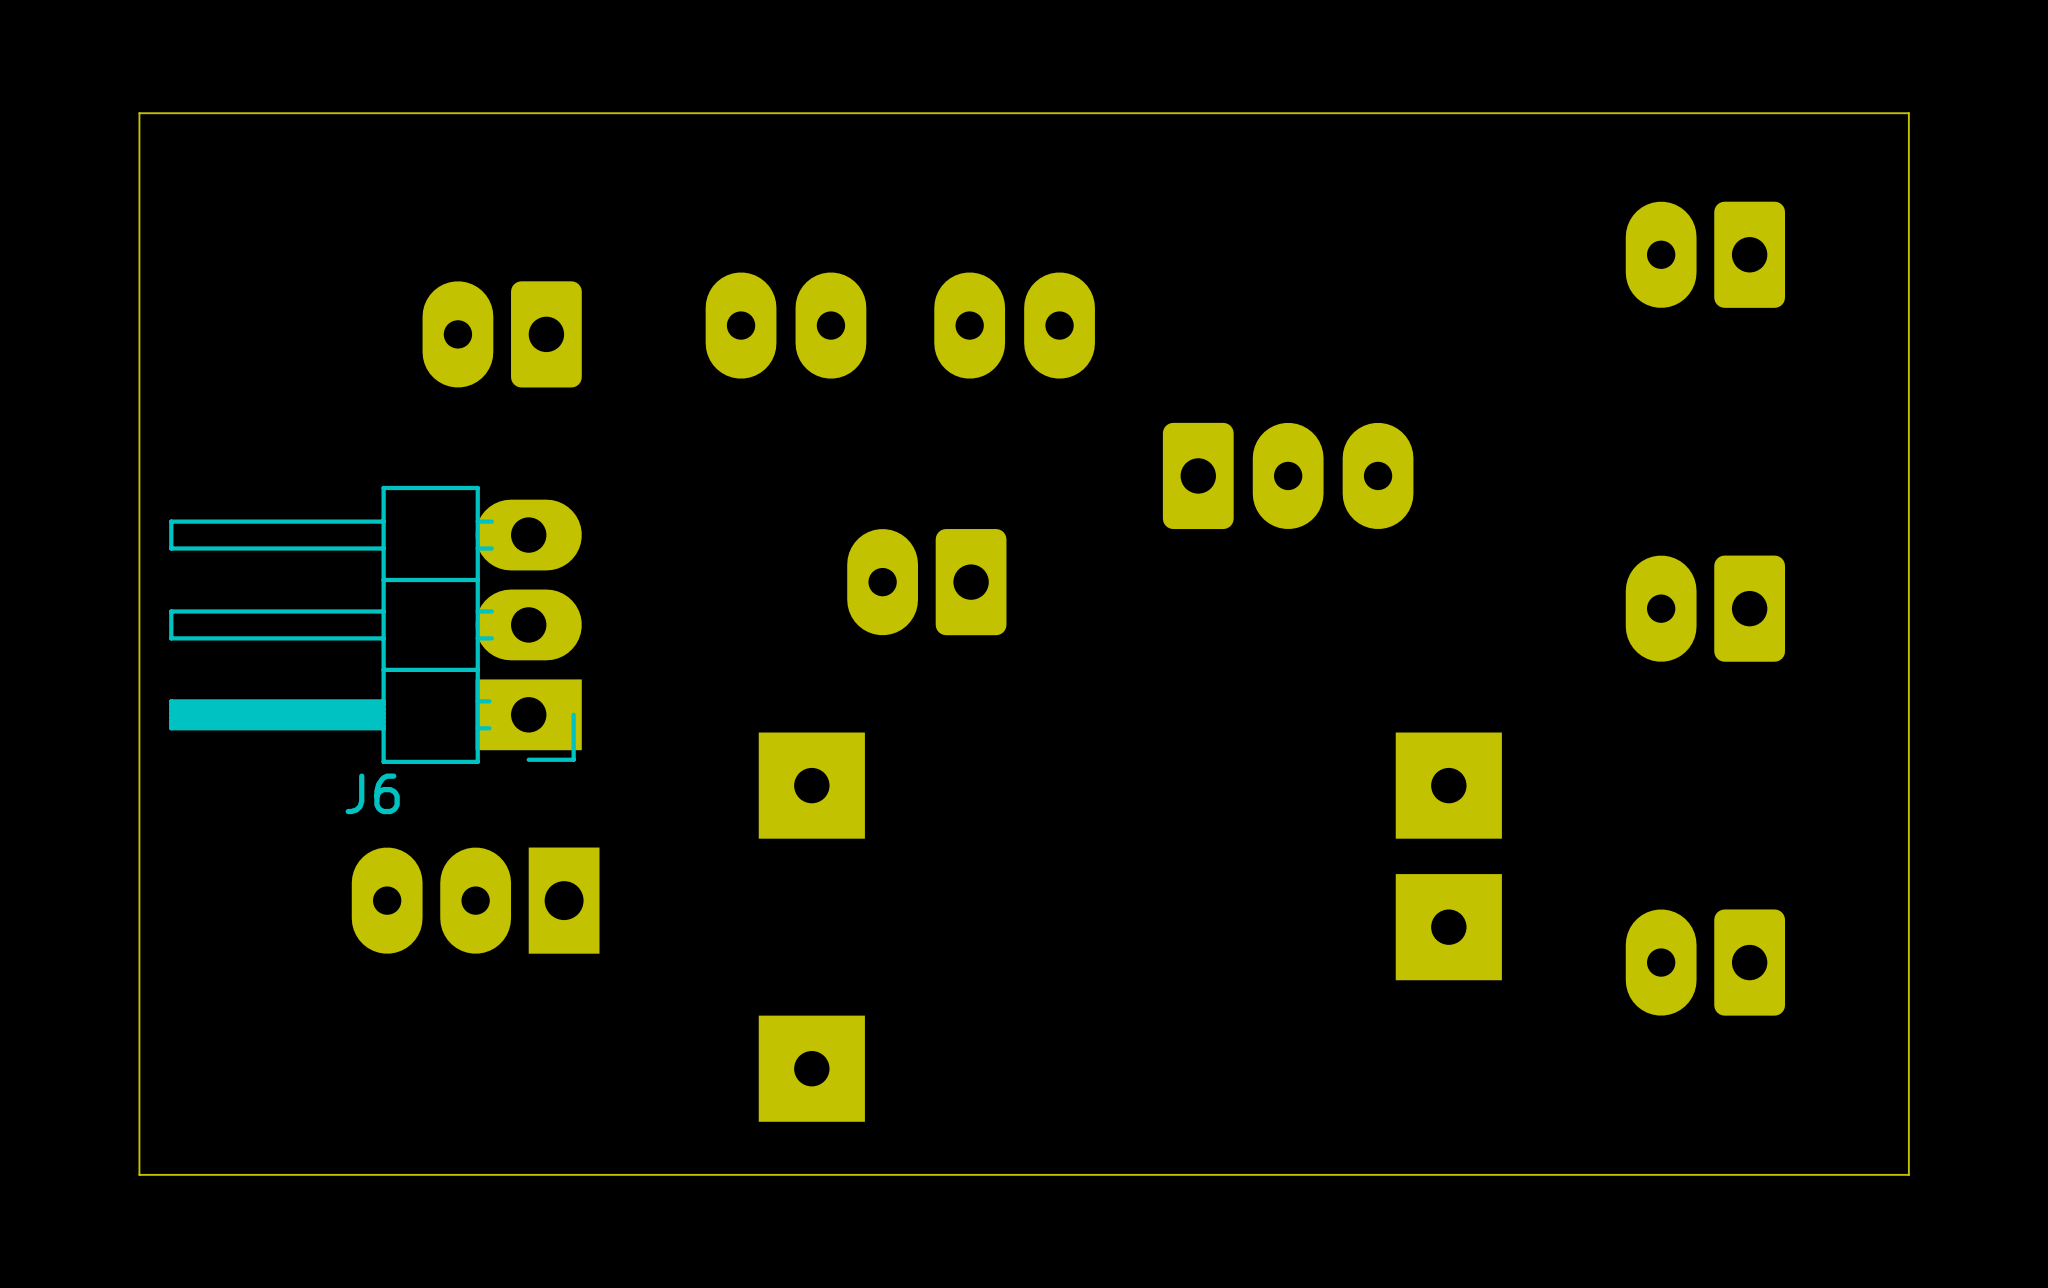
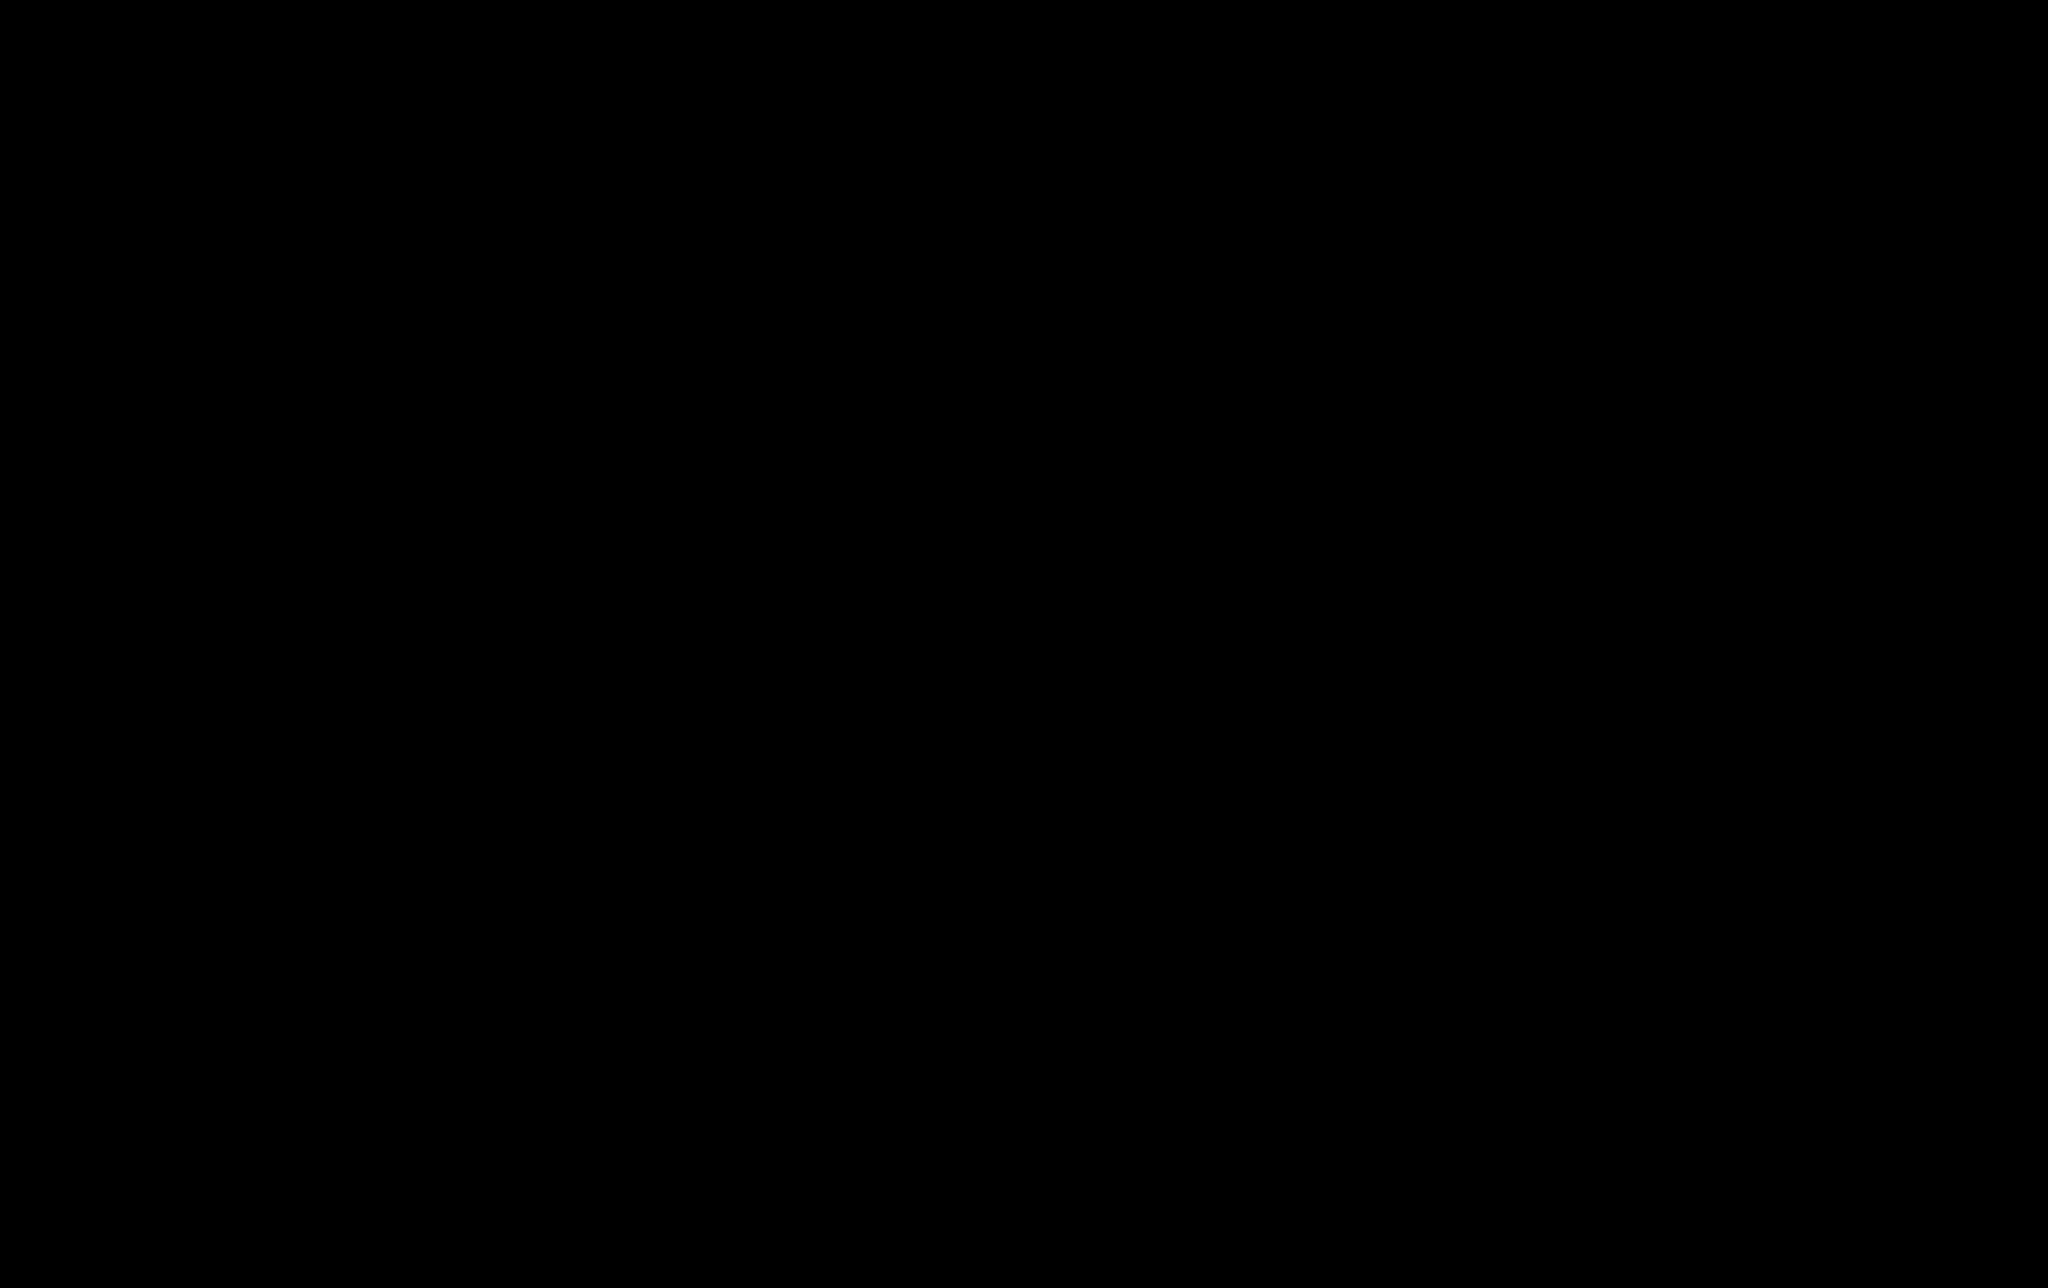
board edge: (1908, 113) (139, 113) (139, 1174) (1908, 1174) (1908, 113) -> none
part: (1705, 254) -> none
part: (785, 325) -> none
part: (1014, 325) -> none
part: (502, 334) -> none
part: (1288, 475) -> none
part: (926, 582) -> none
part: (1705, 608) -> none
J6: (375, 624) -> none
part: (811, 785) -> none
part: (1448, 785) -> none
part: (475, 900) -> none
part: (1448, 927) -> none
part: (1705, 962) -> none
part: (811, 1068) -> none

